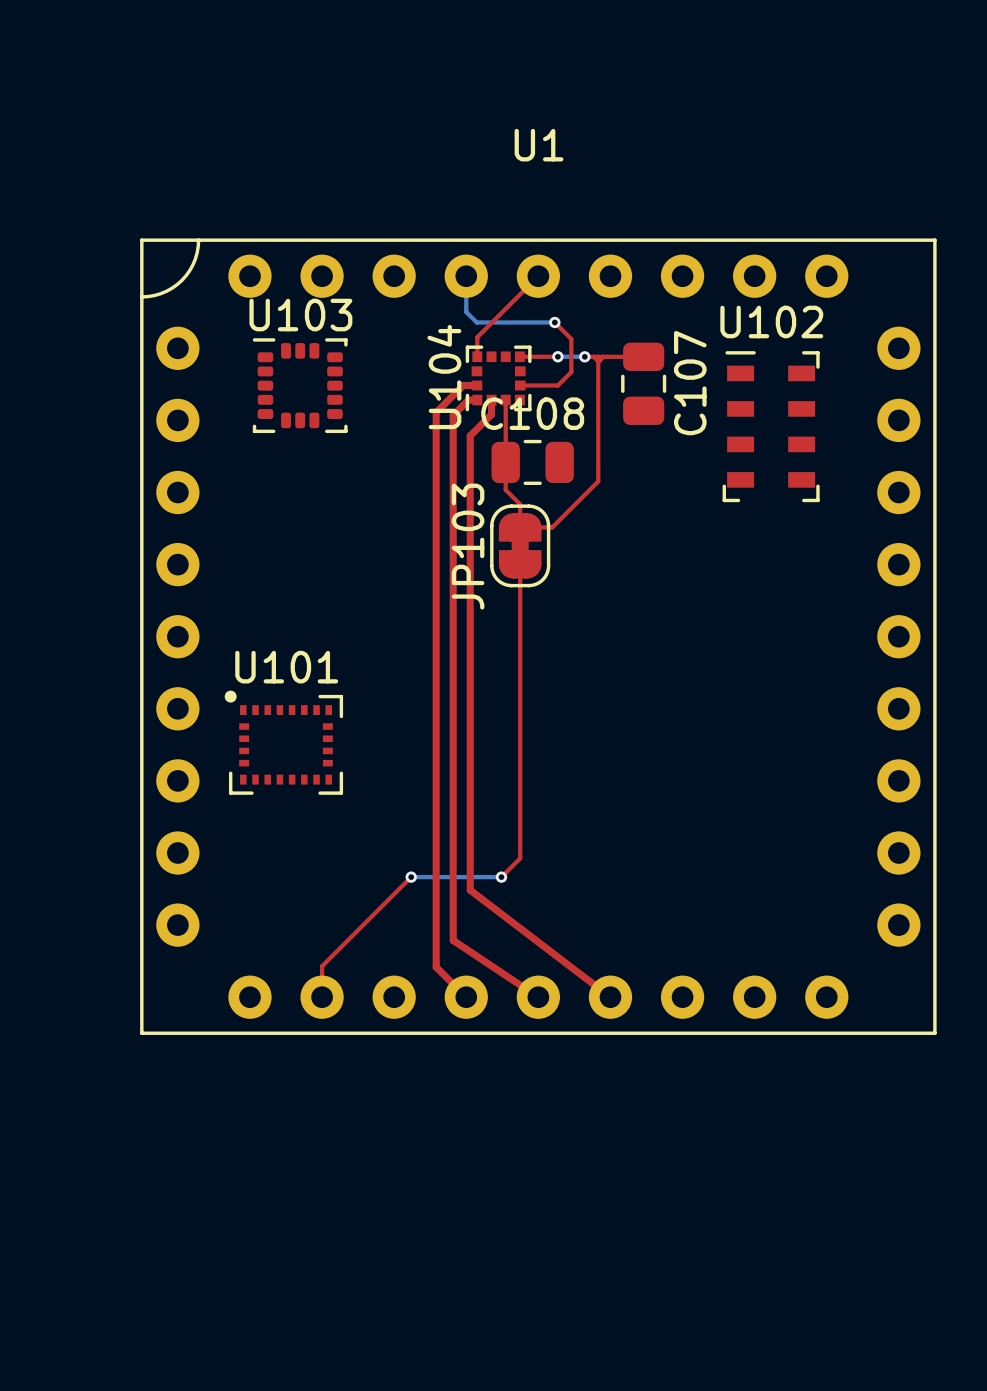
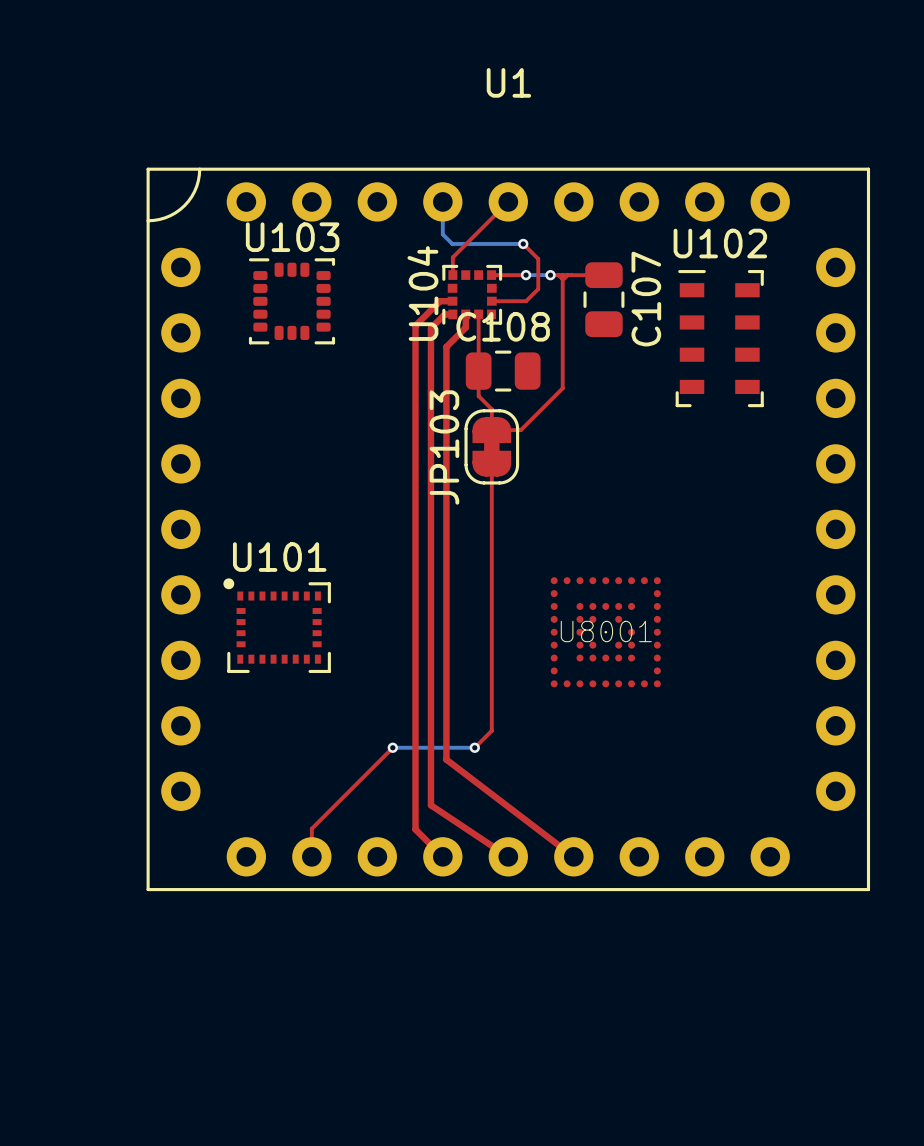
U8001: none -> (605, 632)

